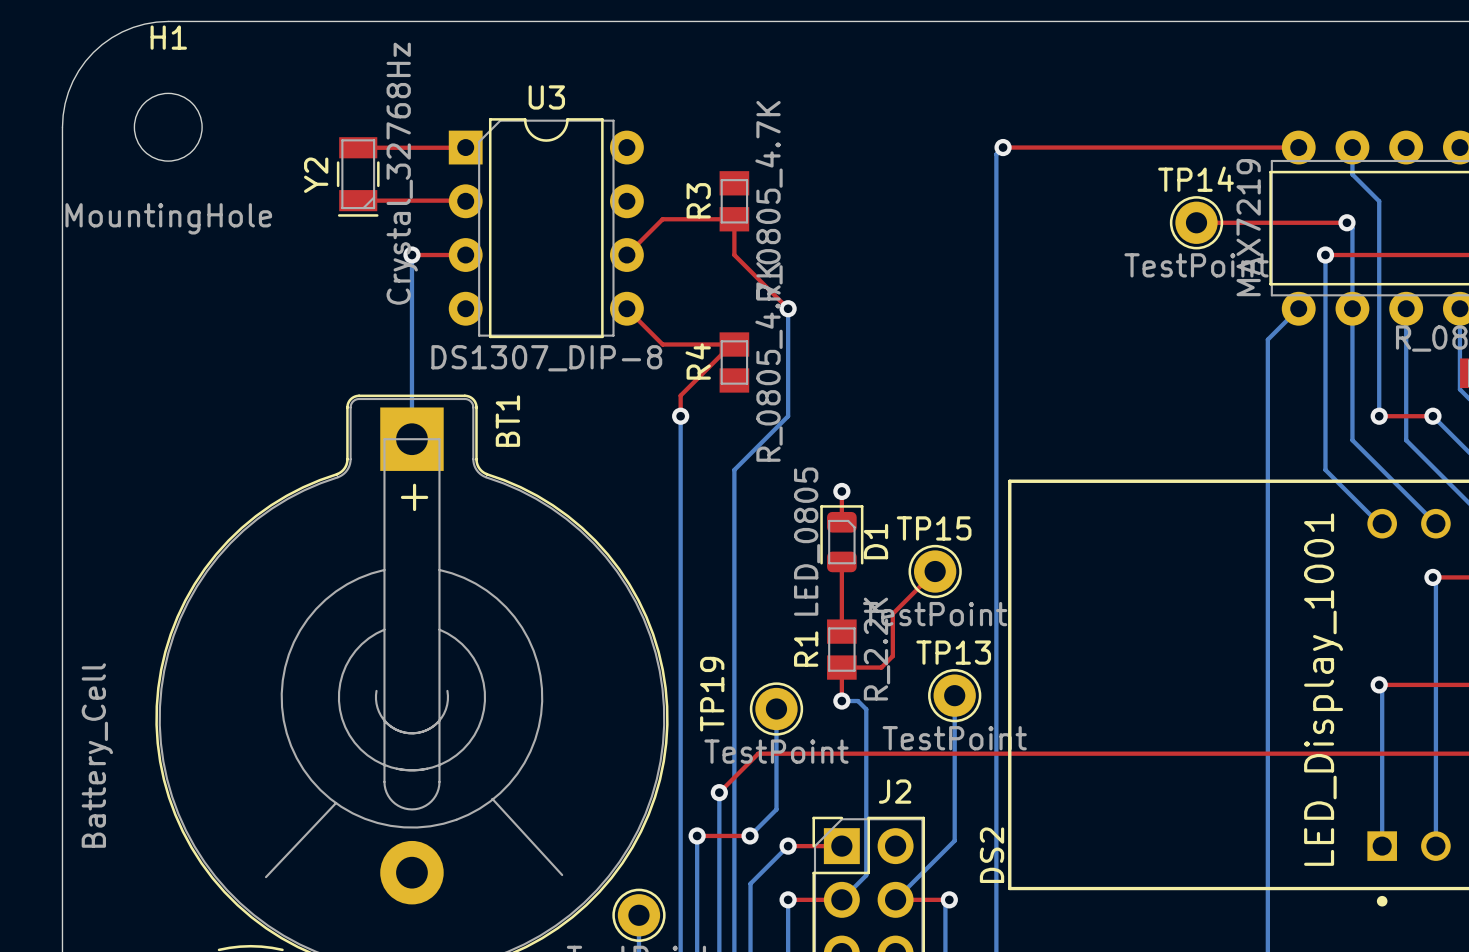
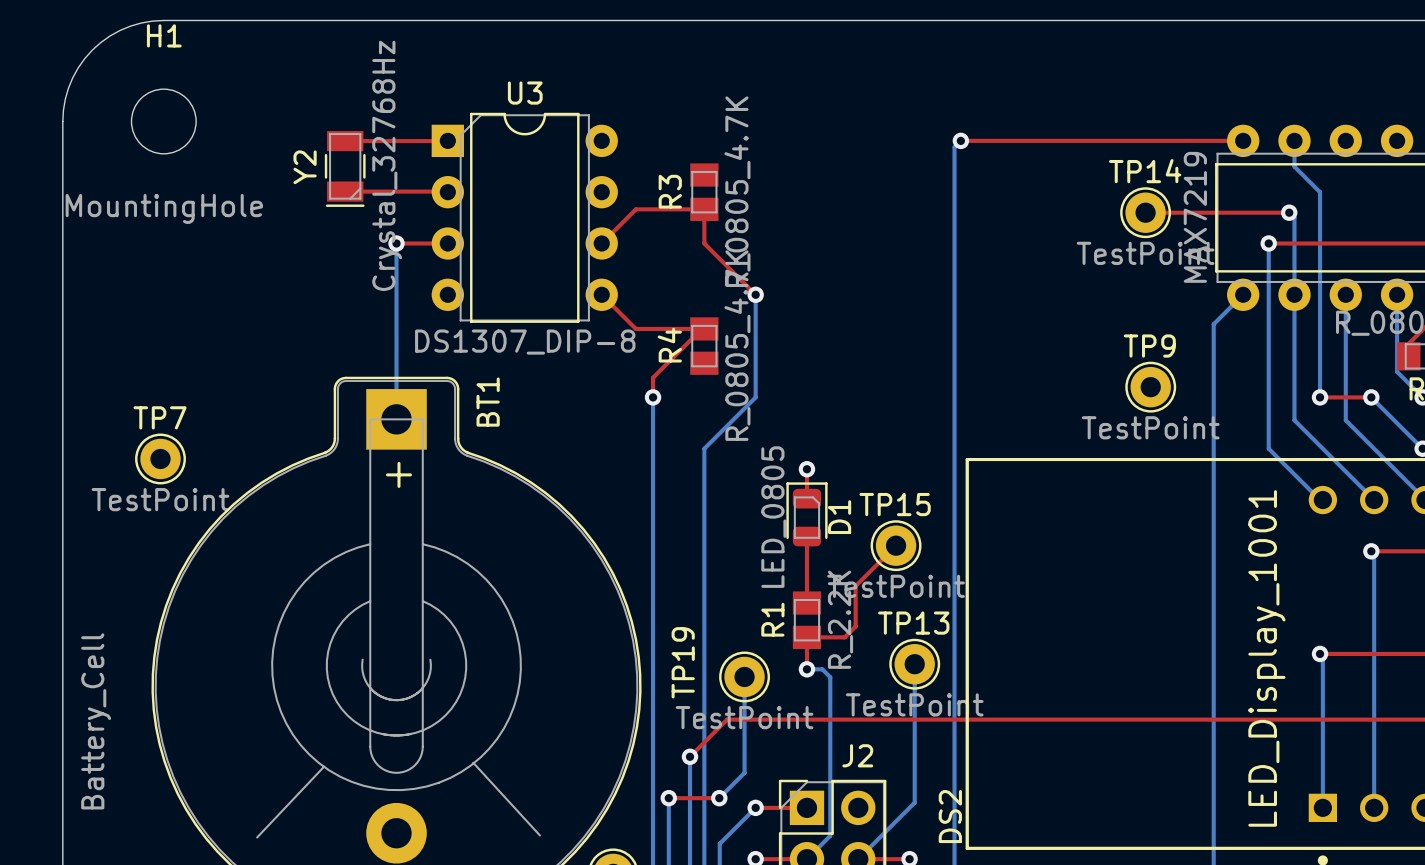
TP9: none -> TestPoint (1150, 387)
TP7: none -> TestPoint (160, 458)

